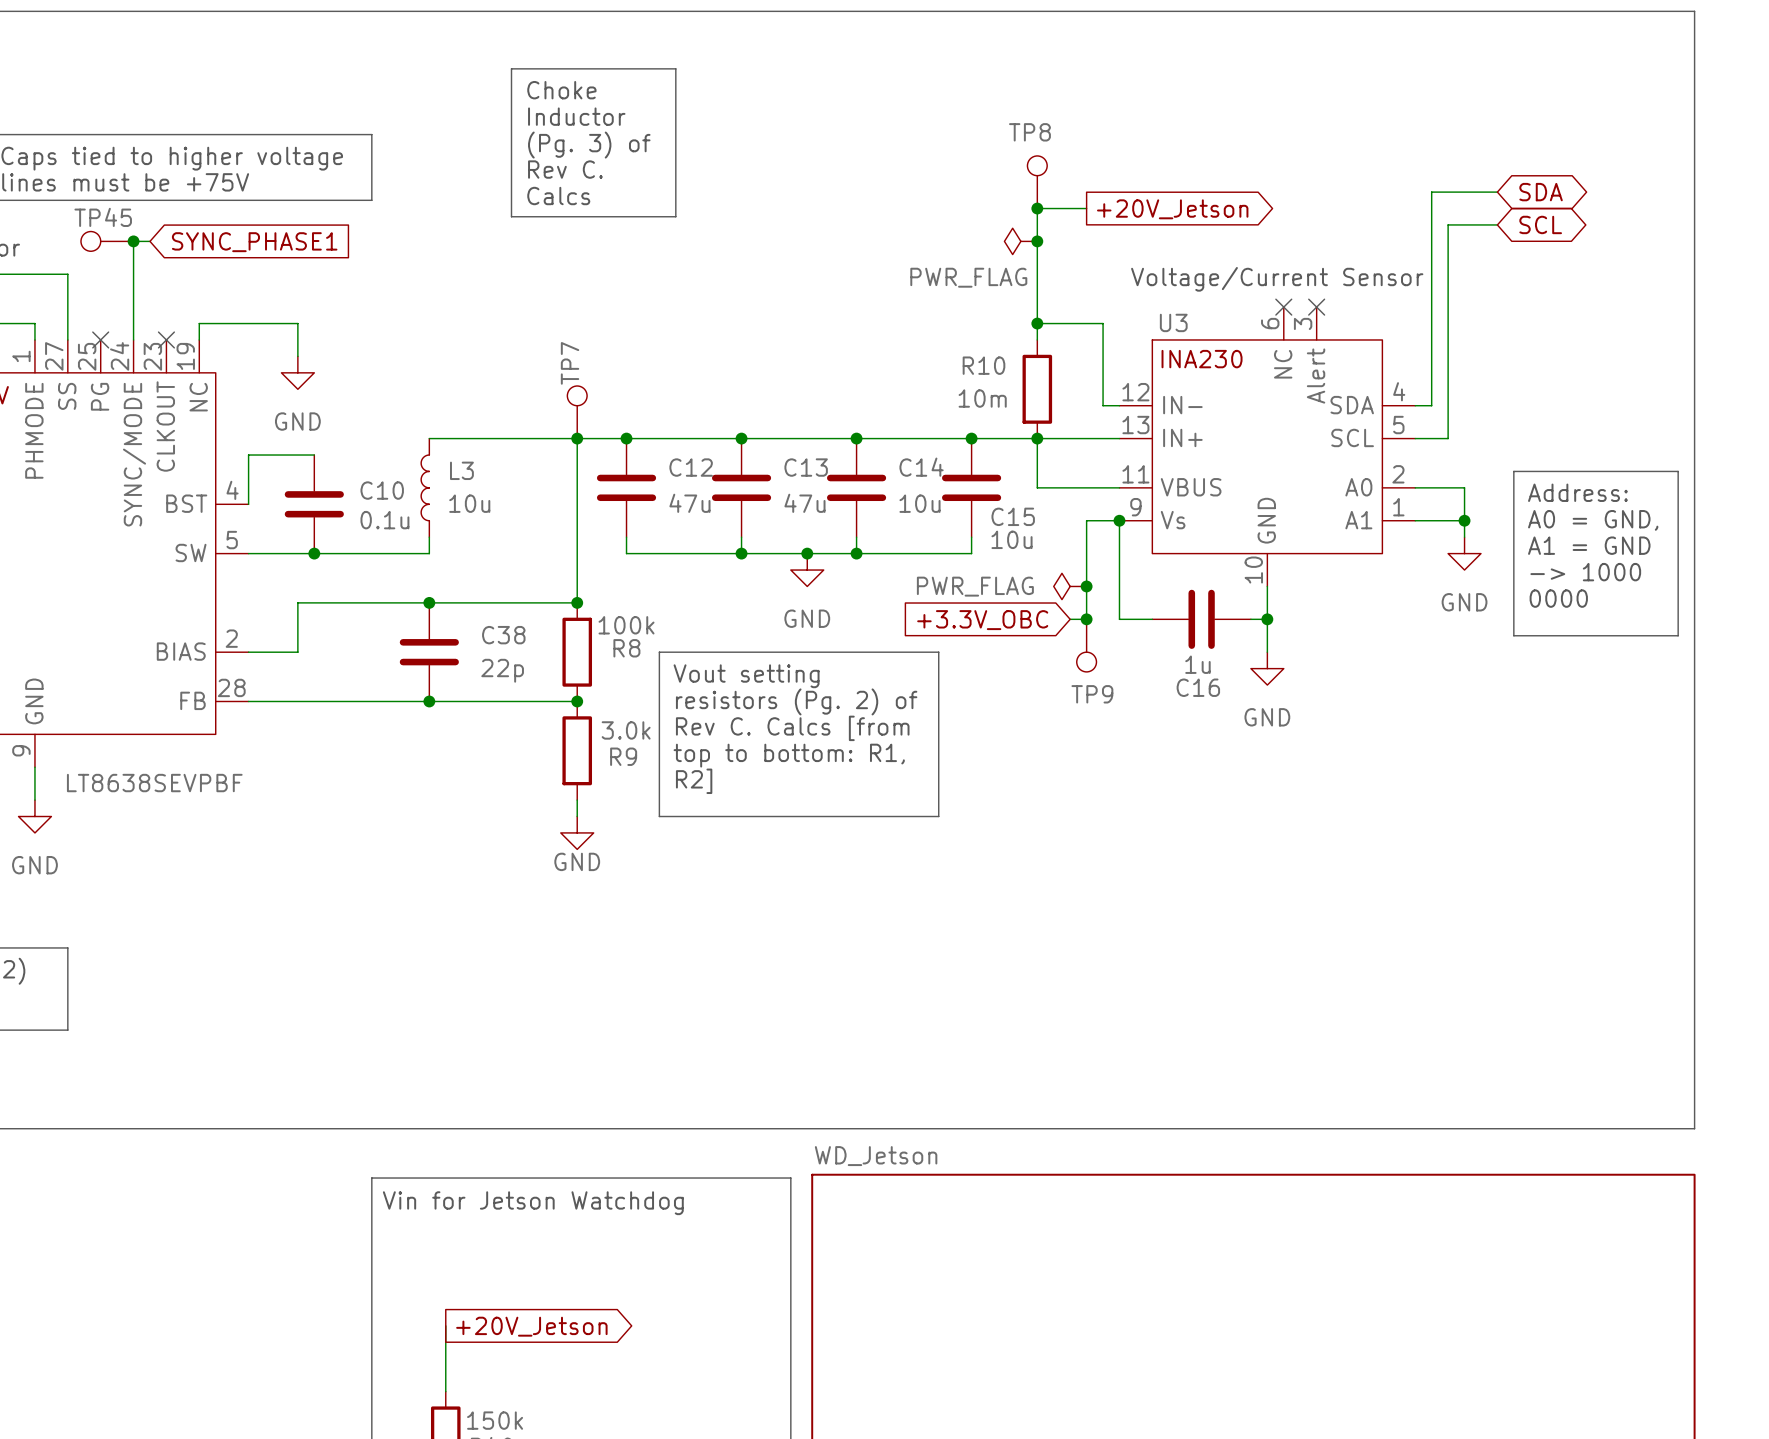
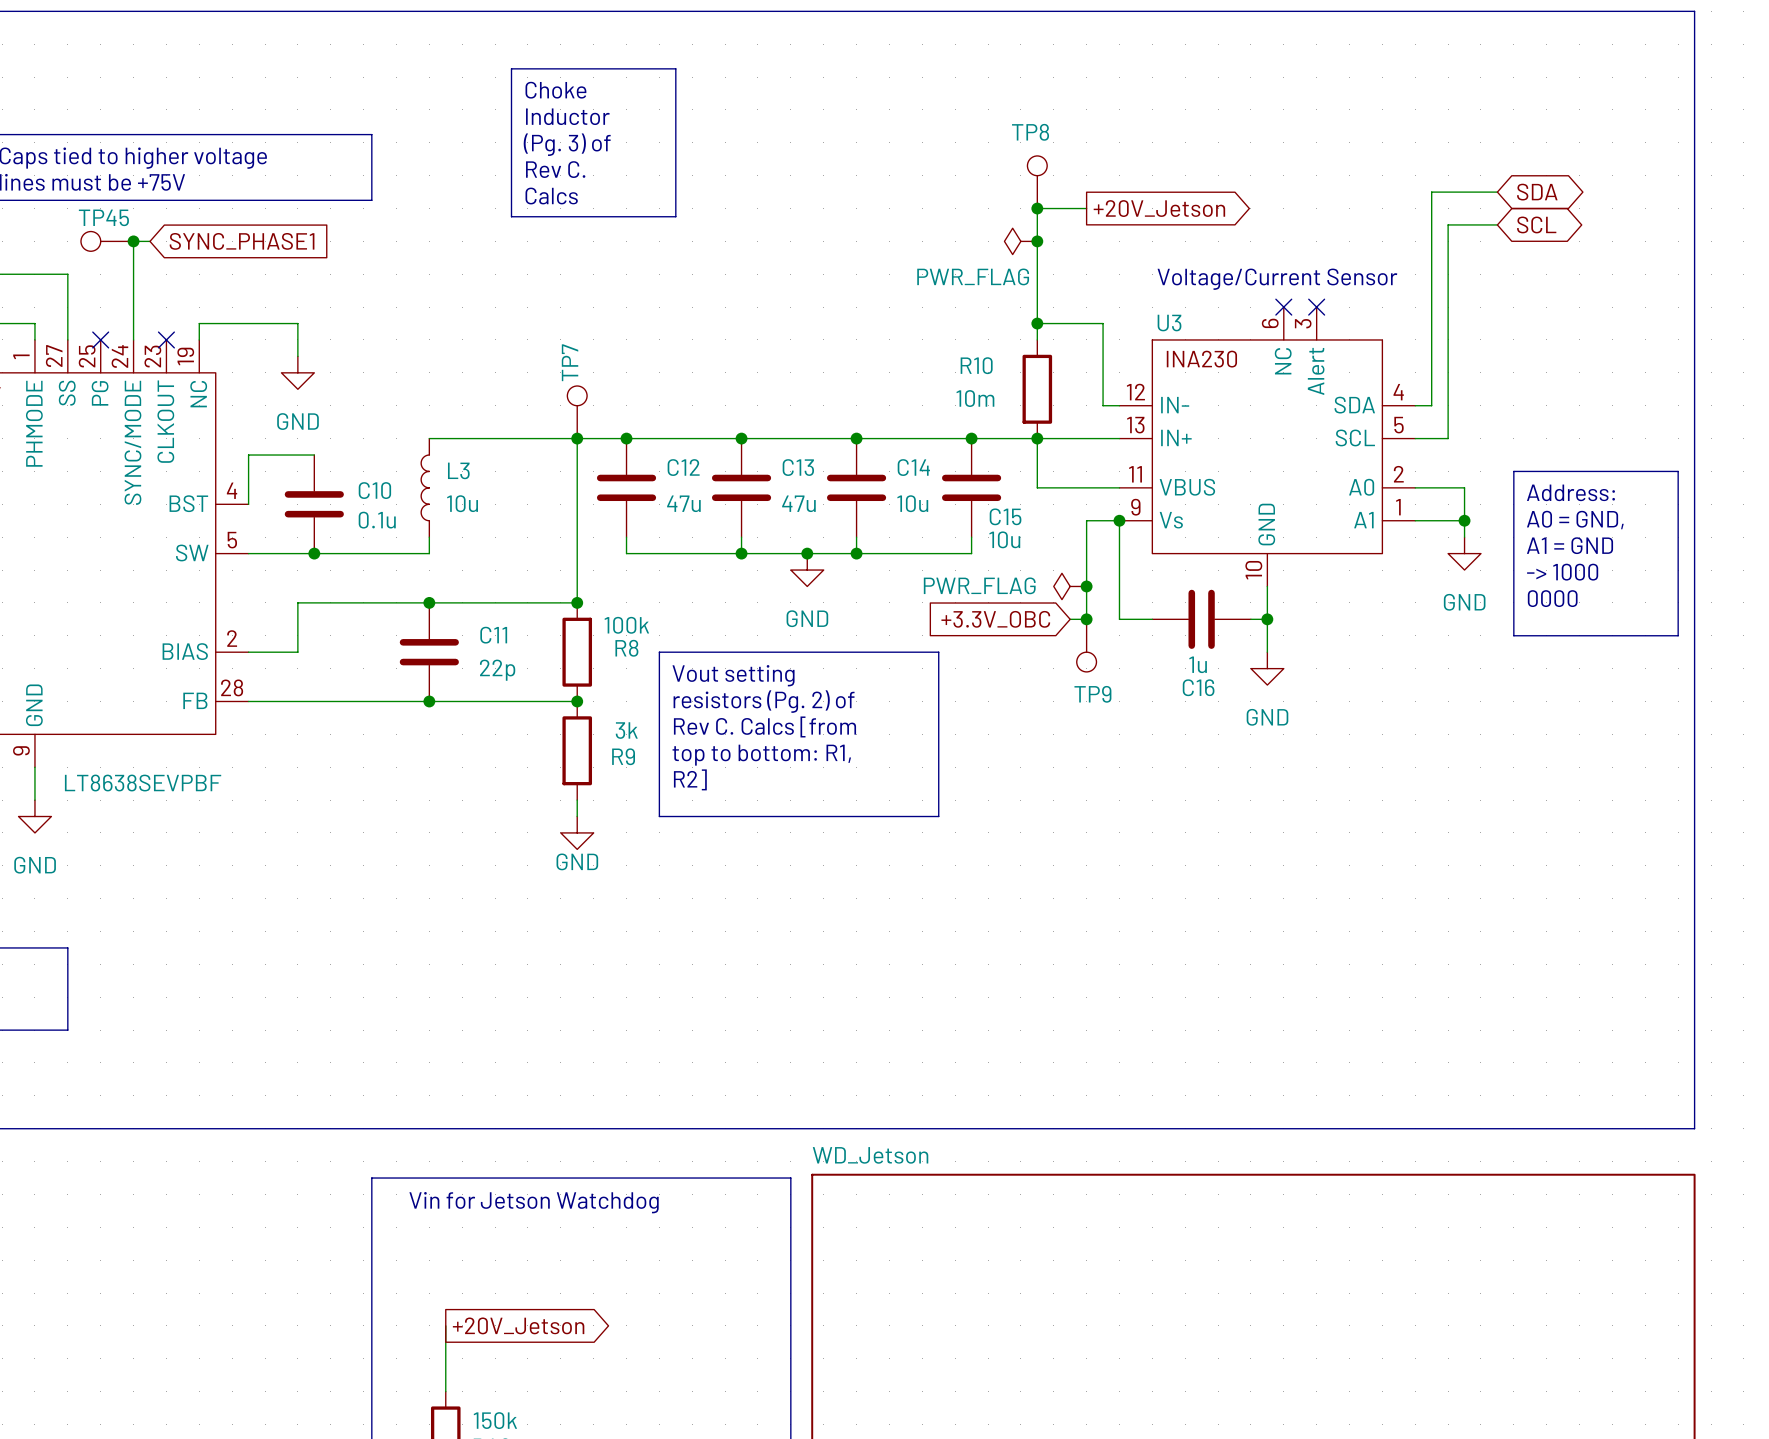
C38 name: C38 (503, 635) -> C11 (493, 635)
R9 value: 3.0k (626, 730) -> 3k (626, 730)

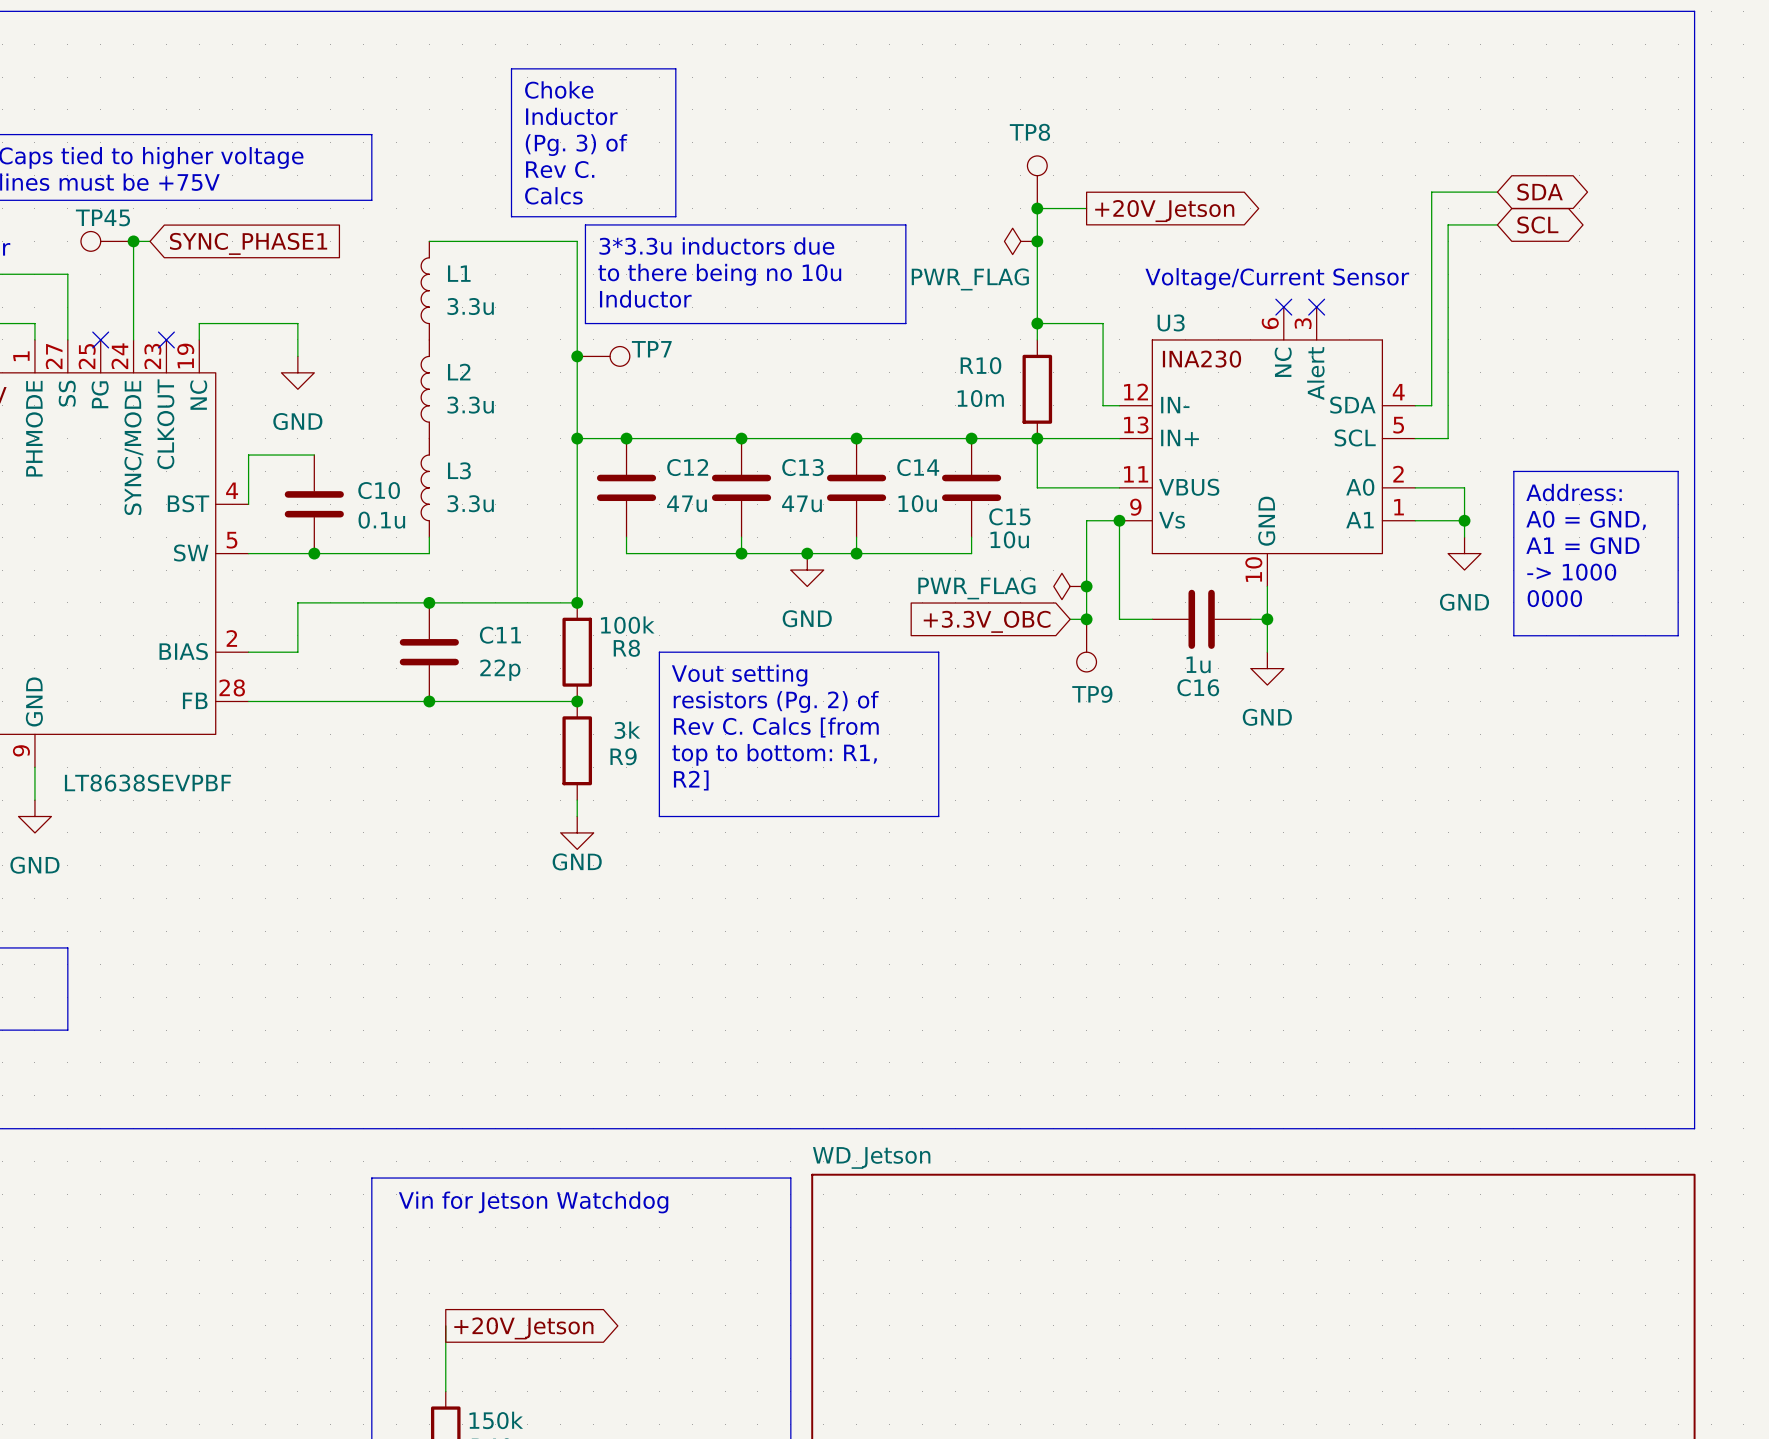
line: none -> (585, 224) (905, 224) (905, 323) (585, 323) (585, 224)
text: none -> 3*3.3u inductors due (716, 246)
text: none -> to there being no 10u (719, 274)
L1: none -> 3.3u (425, 290)
text: none -> Inductor (645, 299)
junction: none -> (577, 356)
L2: none -> 3.3u (425, 389)
TP7 rotation: 0° (577, 395) -> 90° clockwise (619, 356)
TP7 position: (577, 412) -> (603, 356)
wire: (429, 438) (577, 438) -> (429, 241) (577, 241) (577, 438)
L3 value: 10u (462, 503) -> 3.3u (470, 503)

